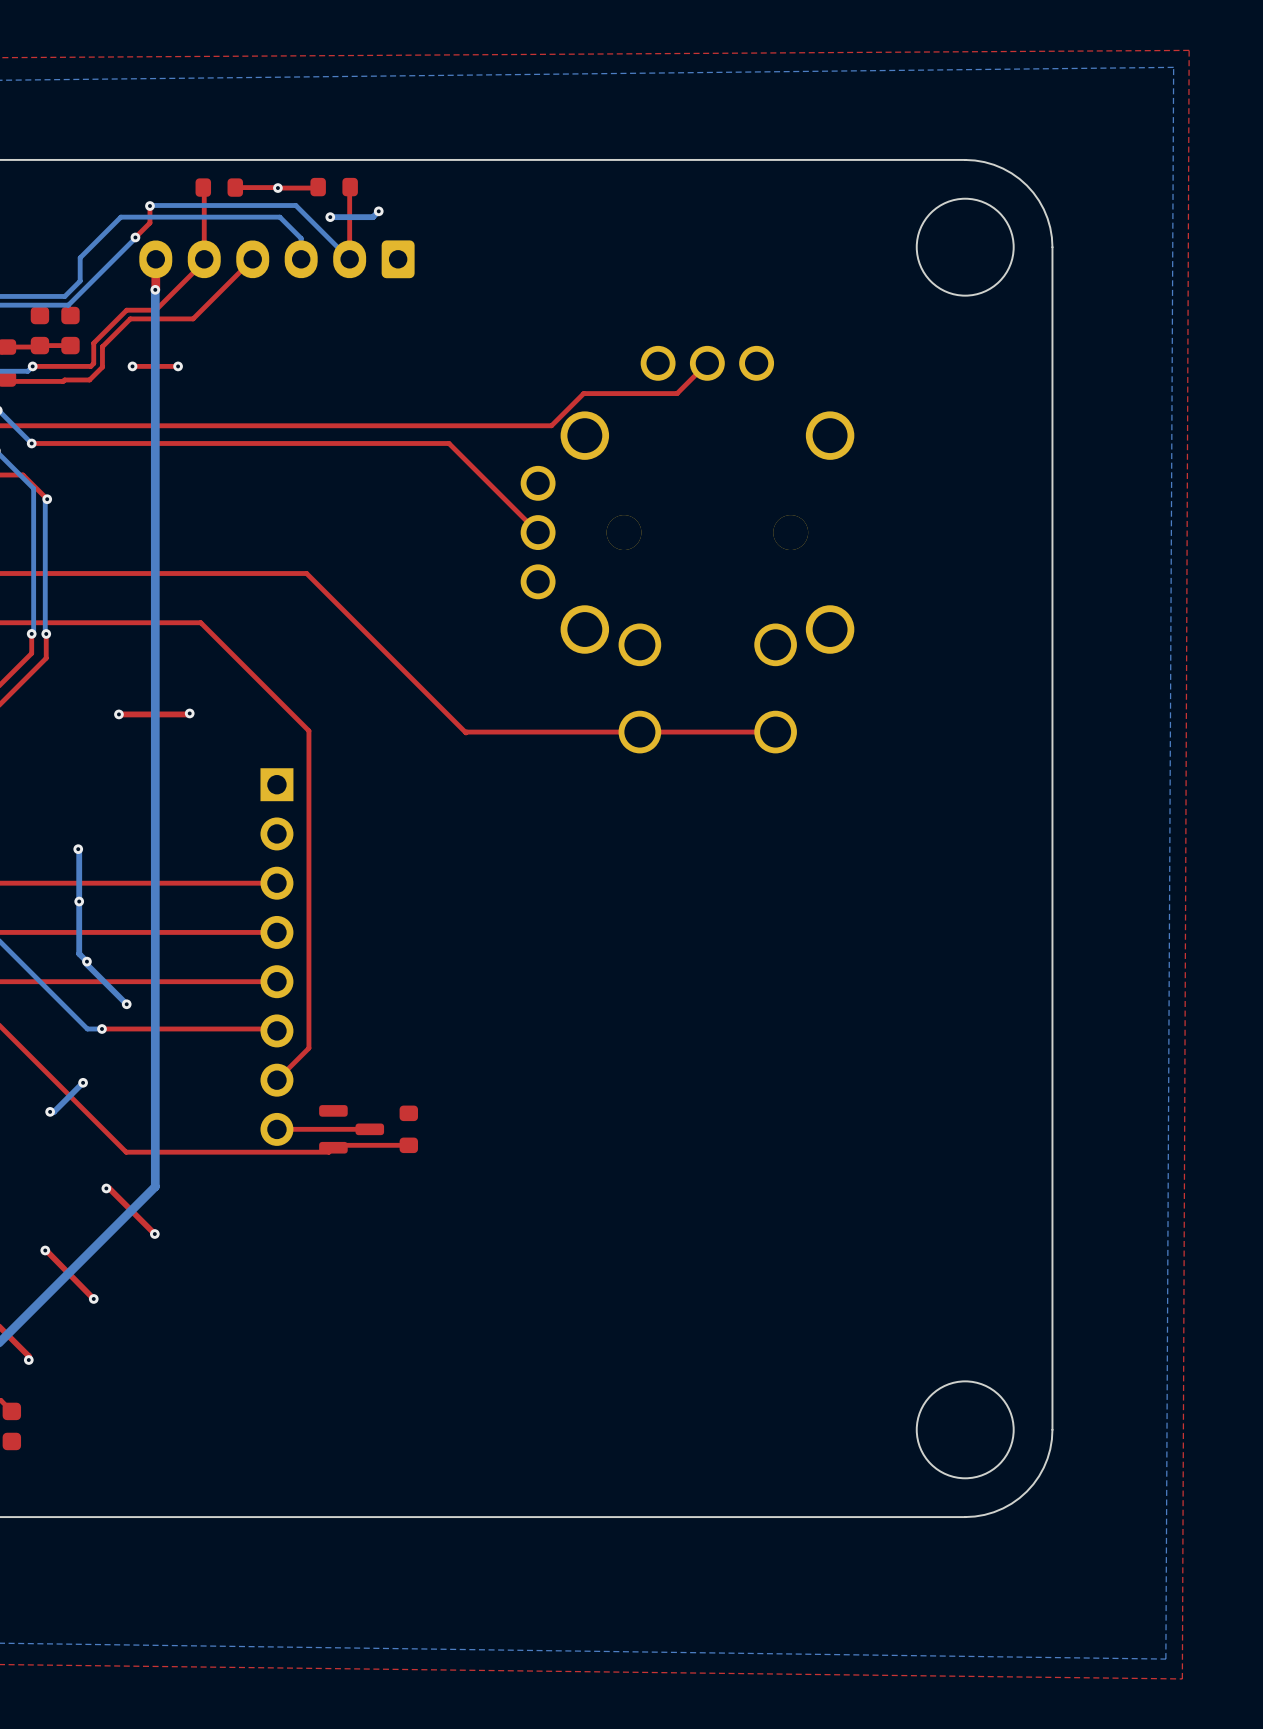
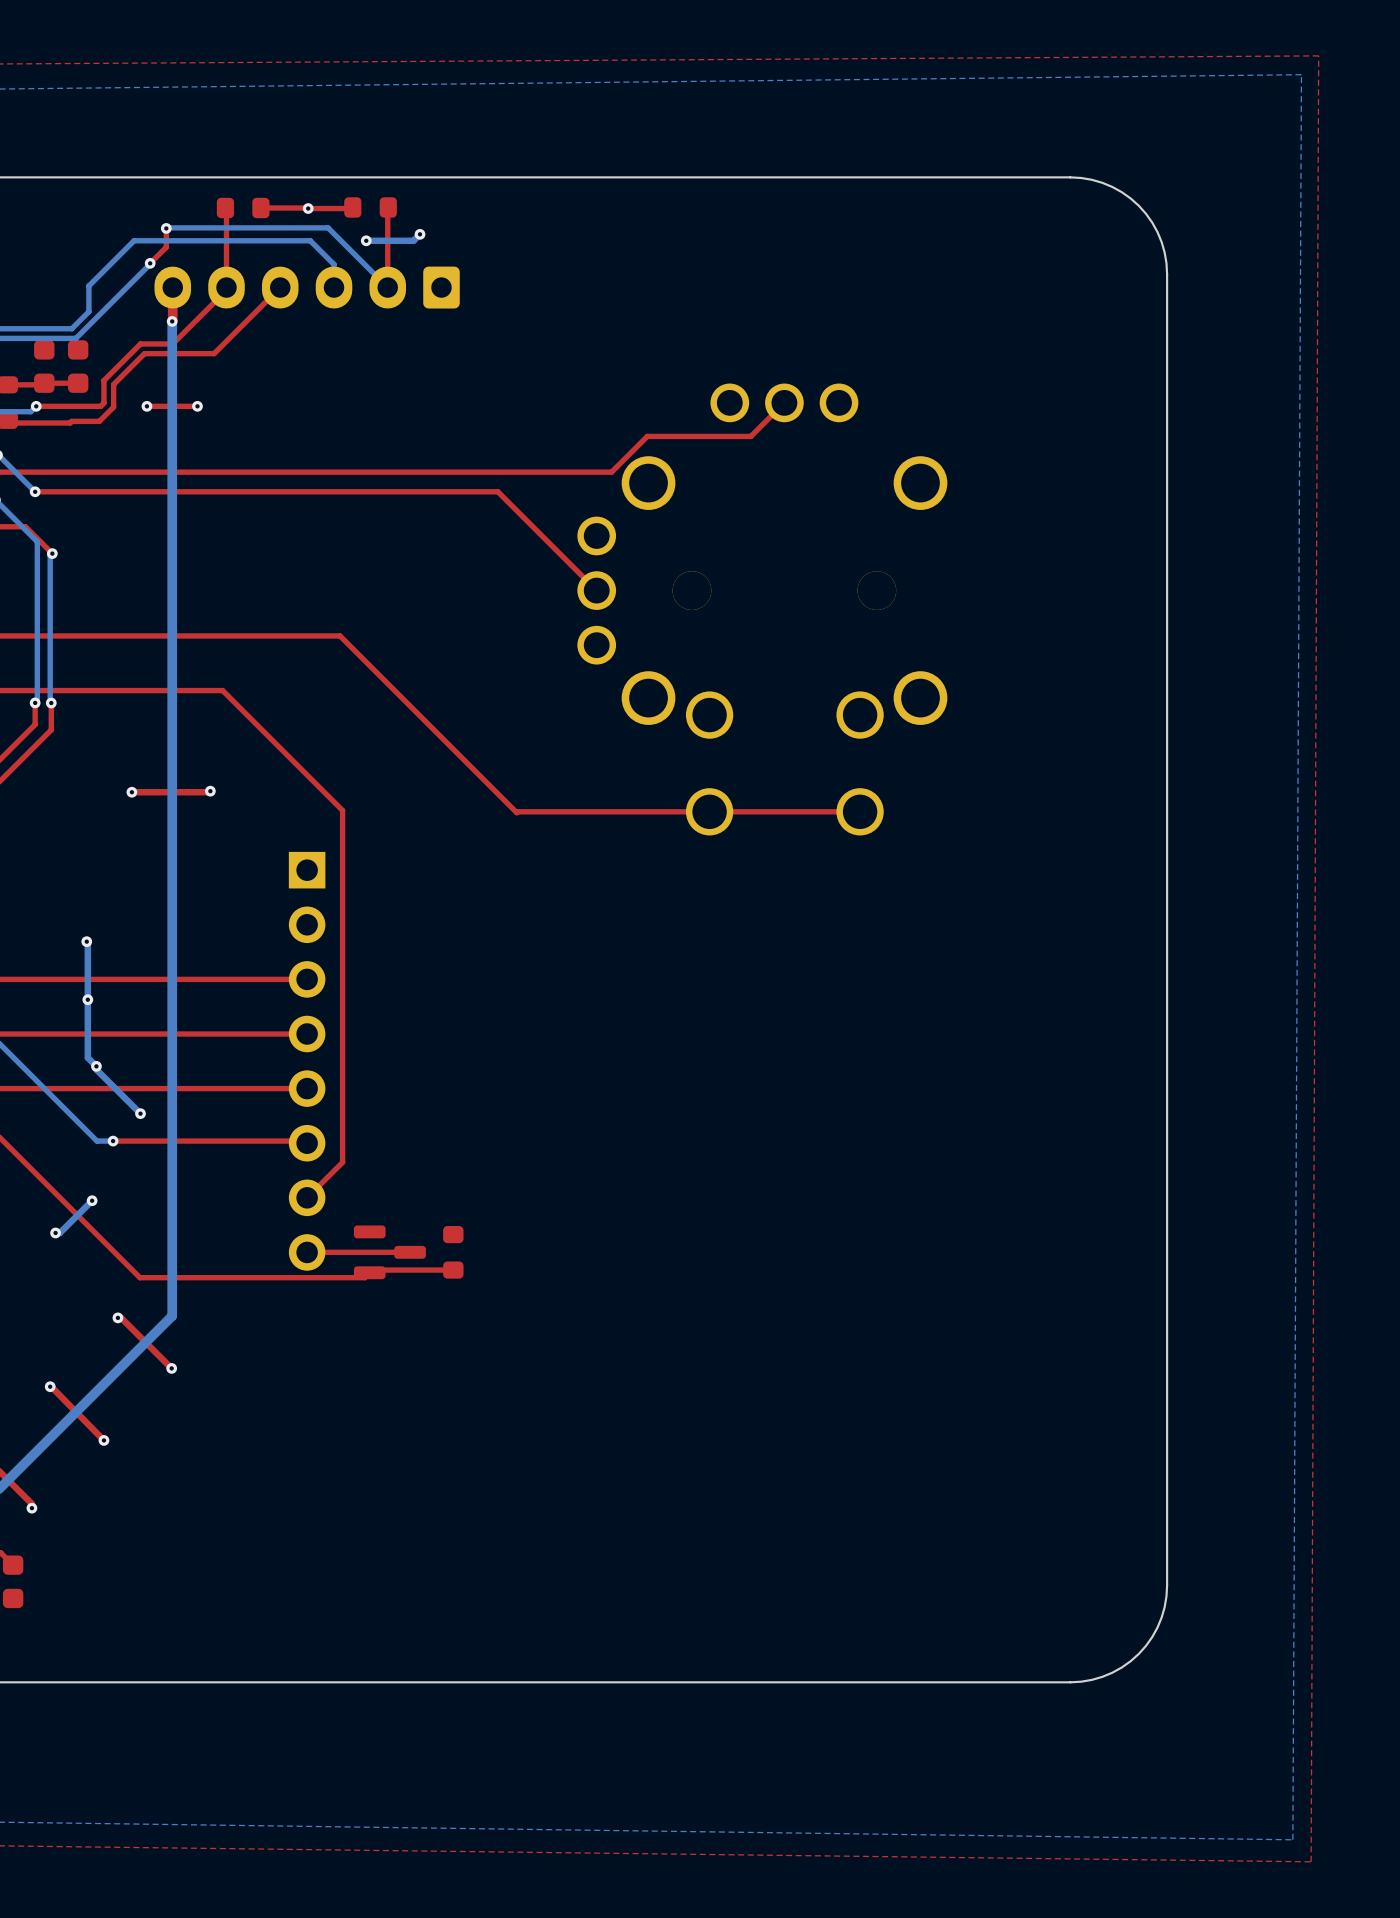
round board edge: [915, 197, 1015, 297] -> none
round board edge: [915, 1380, 1015, 1480] -> none

